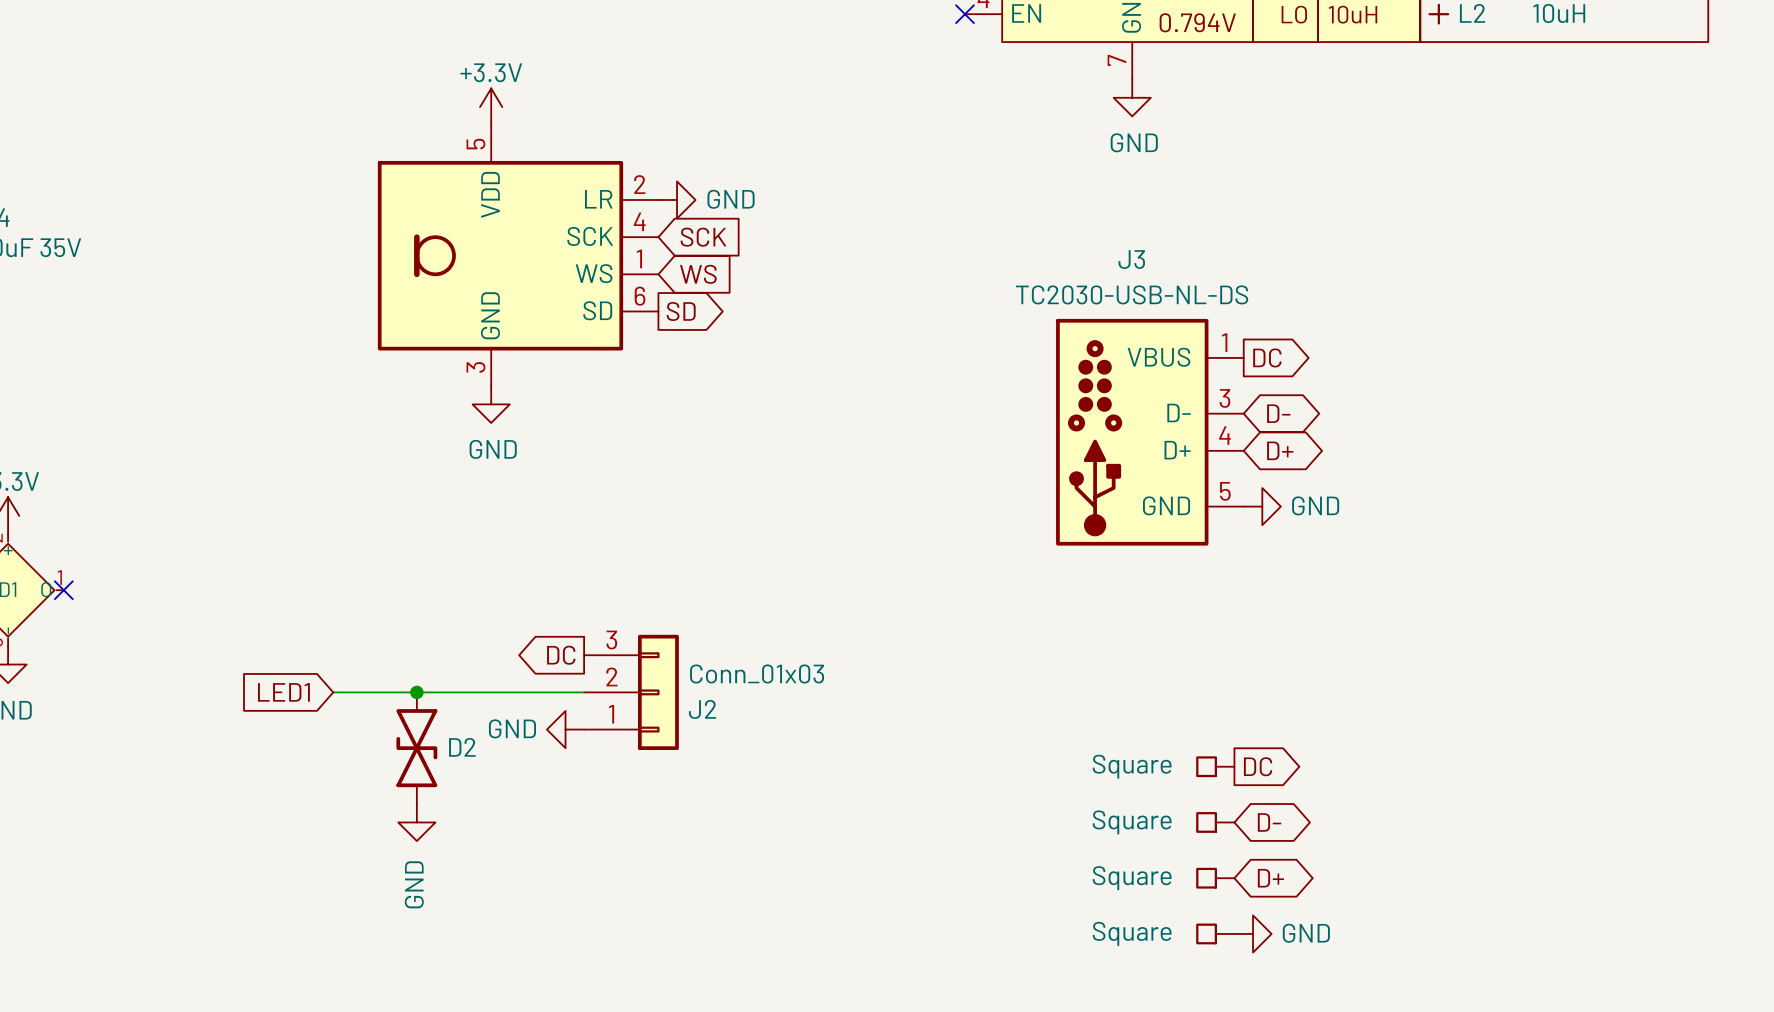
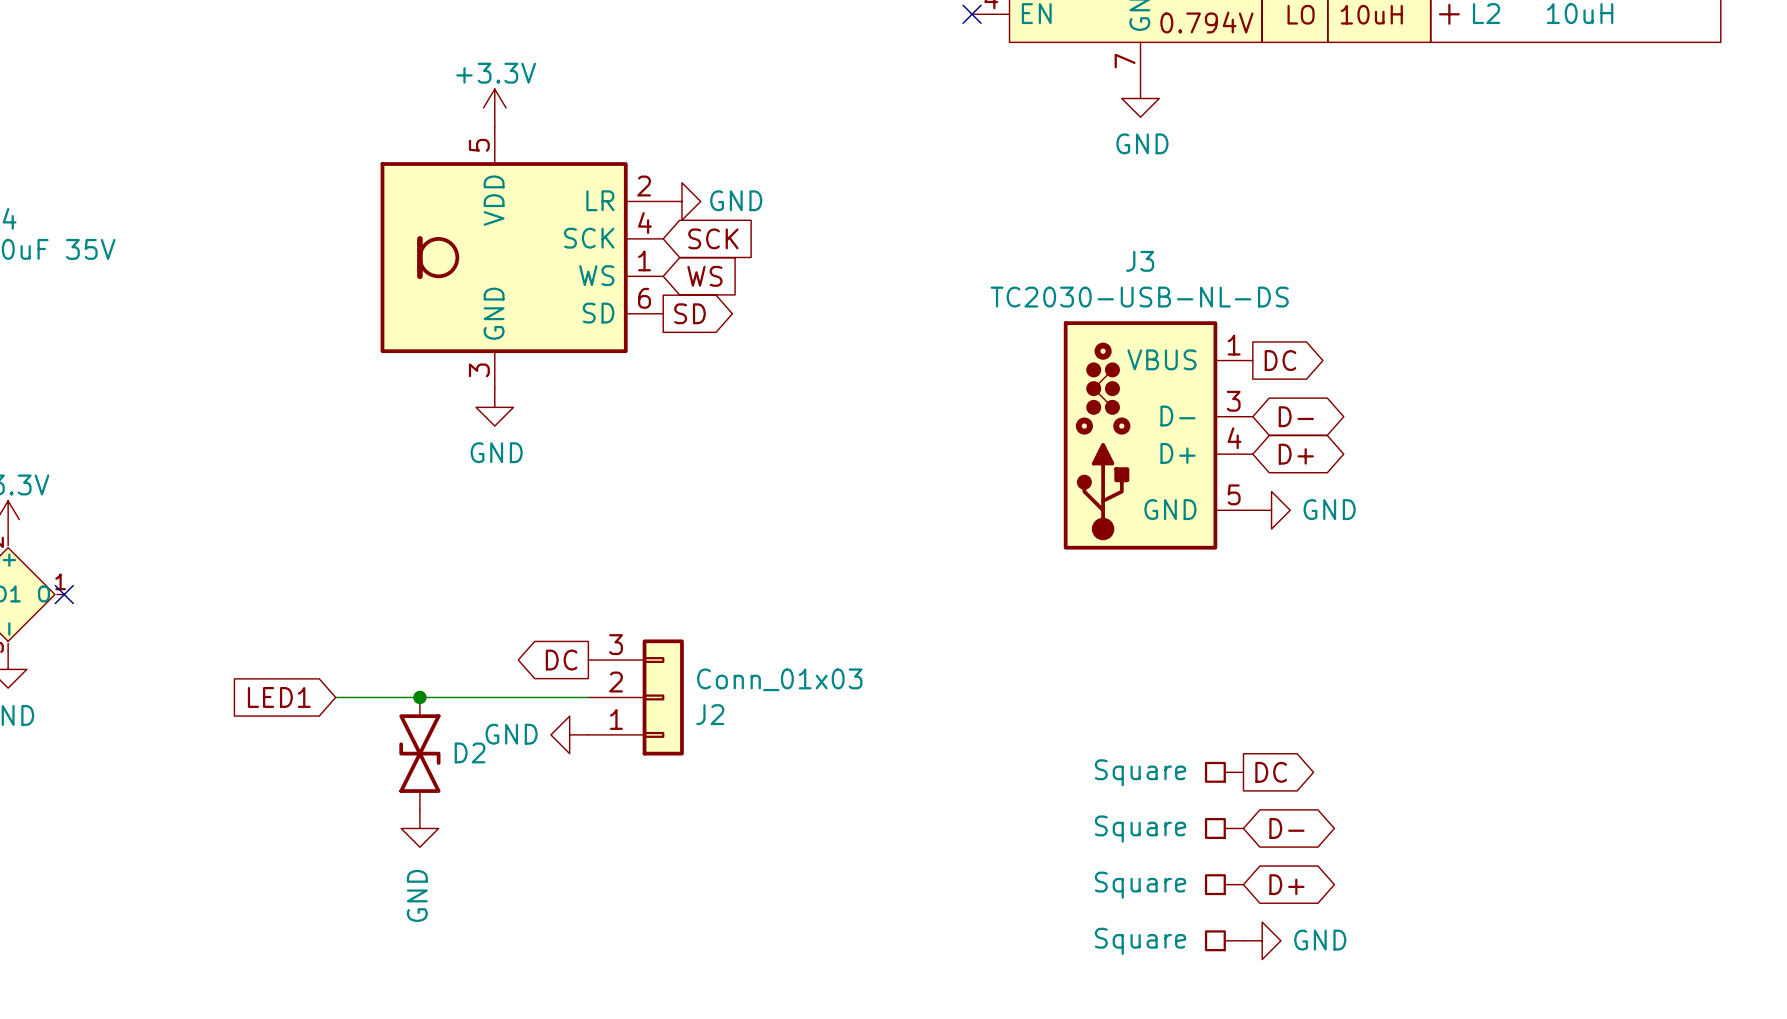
J3 symbol: [1056, 318, 1244, 546] -> [1063, 321, 1253, 550]

